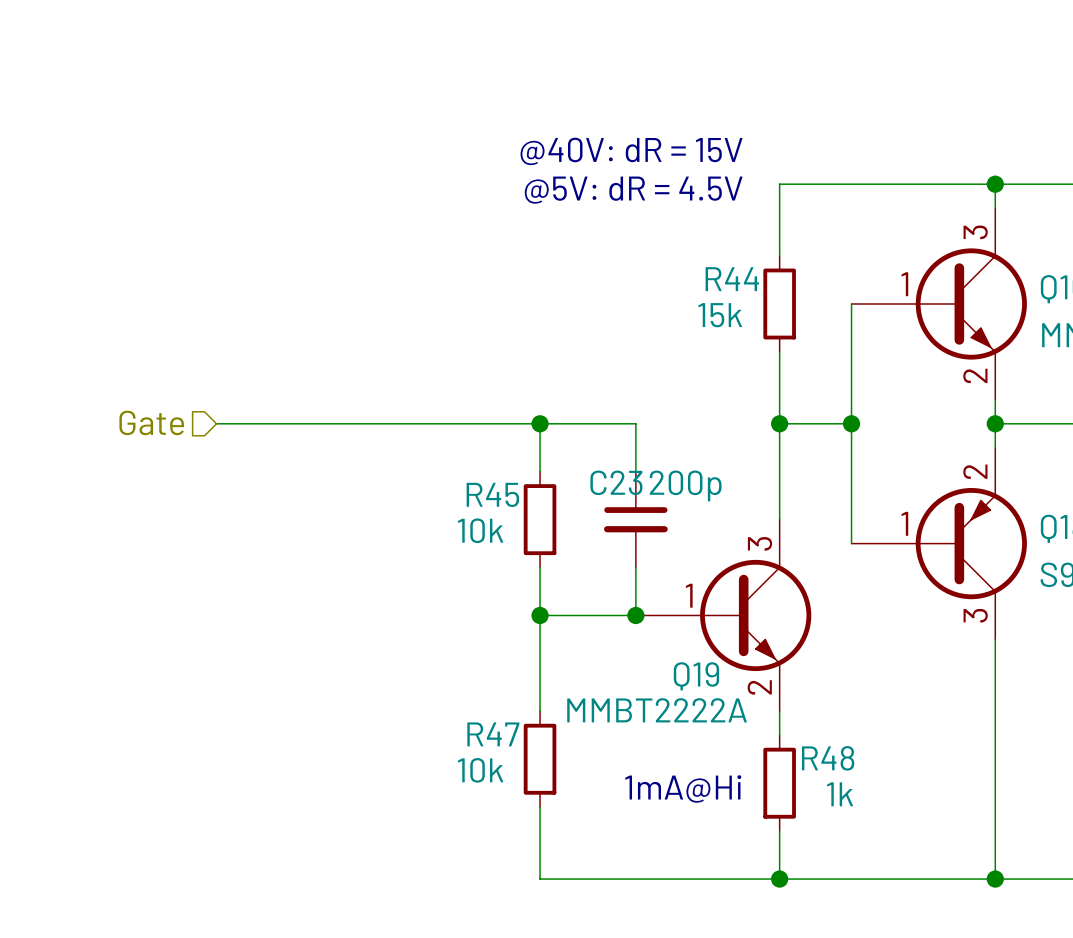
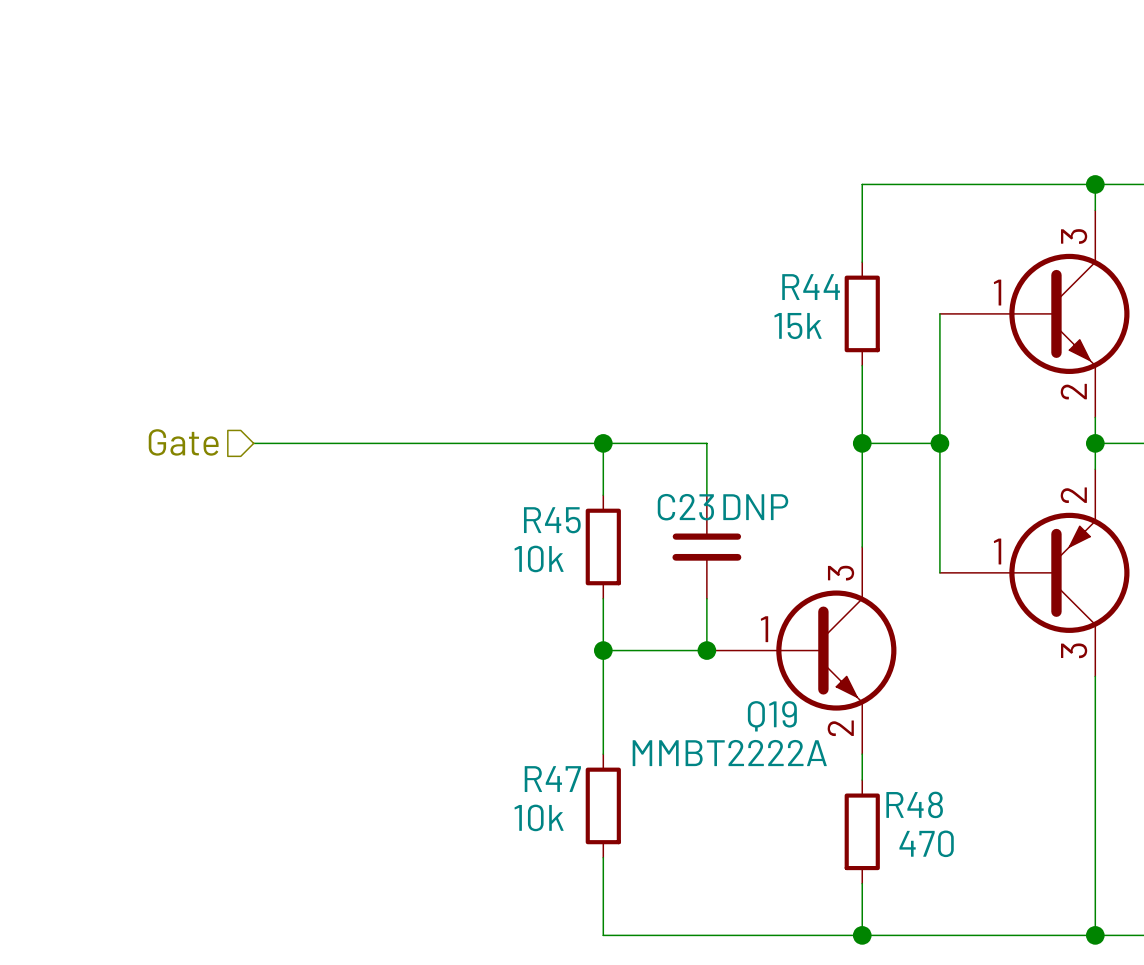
text: @40V: dR = 15V (631, 151) -> none
text: @5V: dR = 4.5V (633, 190) -> none
C23 value: 200p (685, 485) -> DNP (755, 507)
text: 1mA@Hi (683, 788) -> none
R48 value: 1k (840, 794) -> 470 (926, 843)

